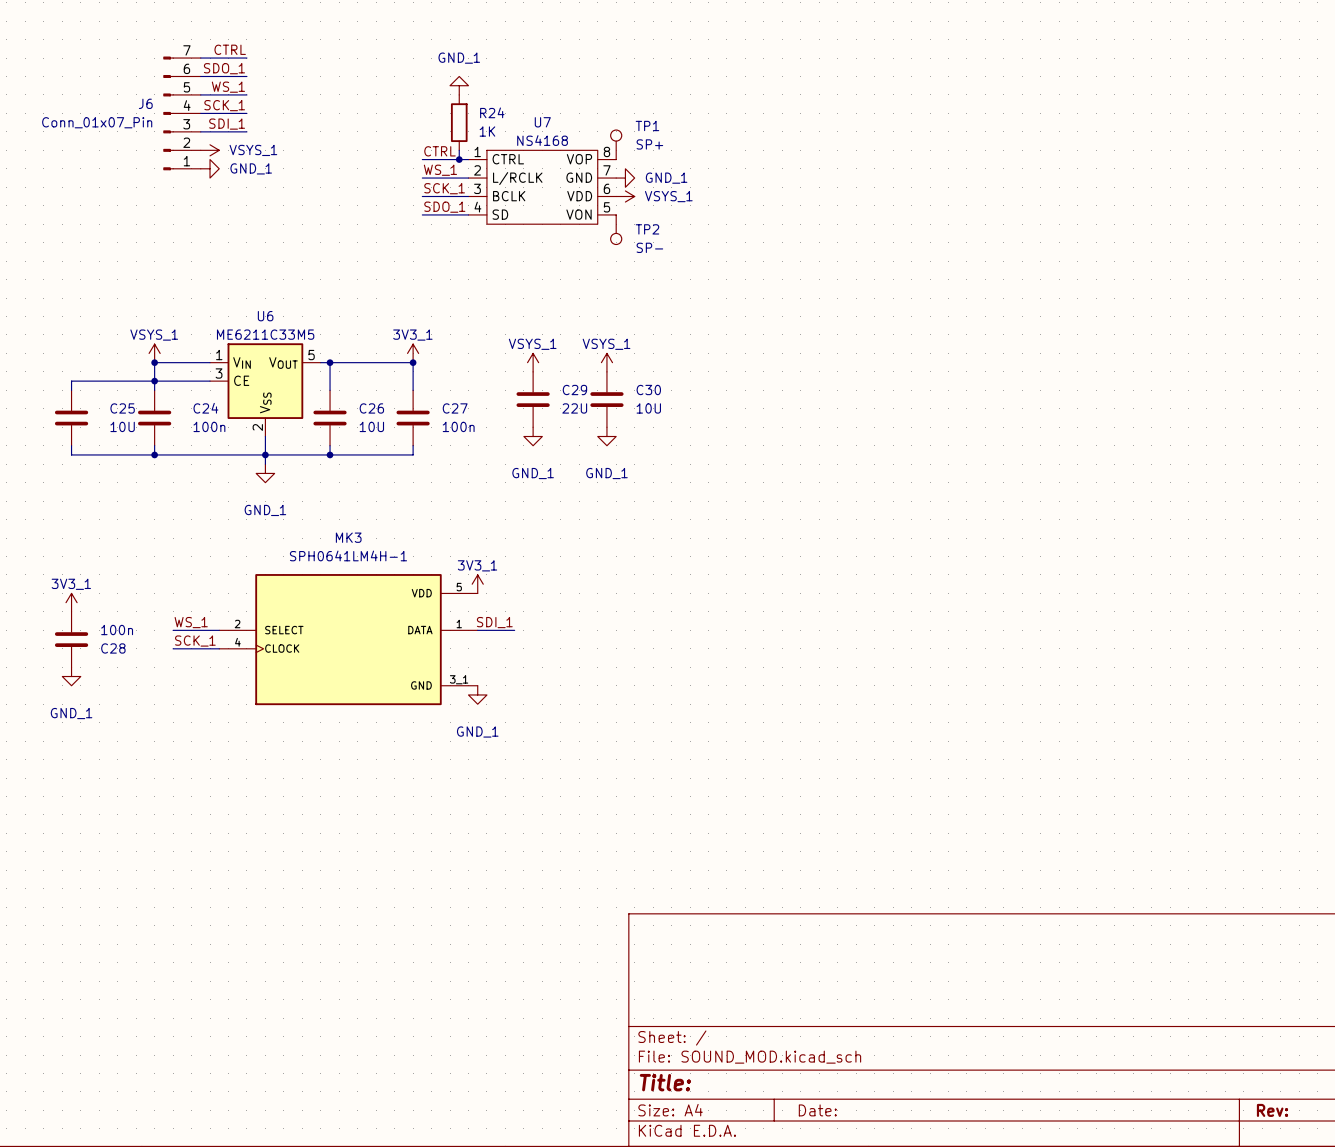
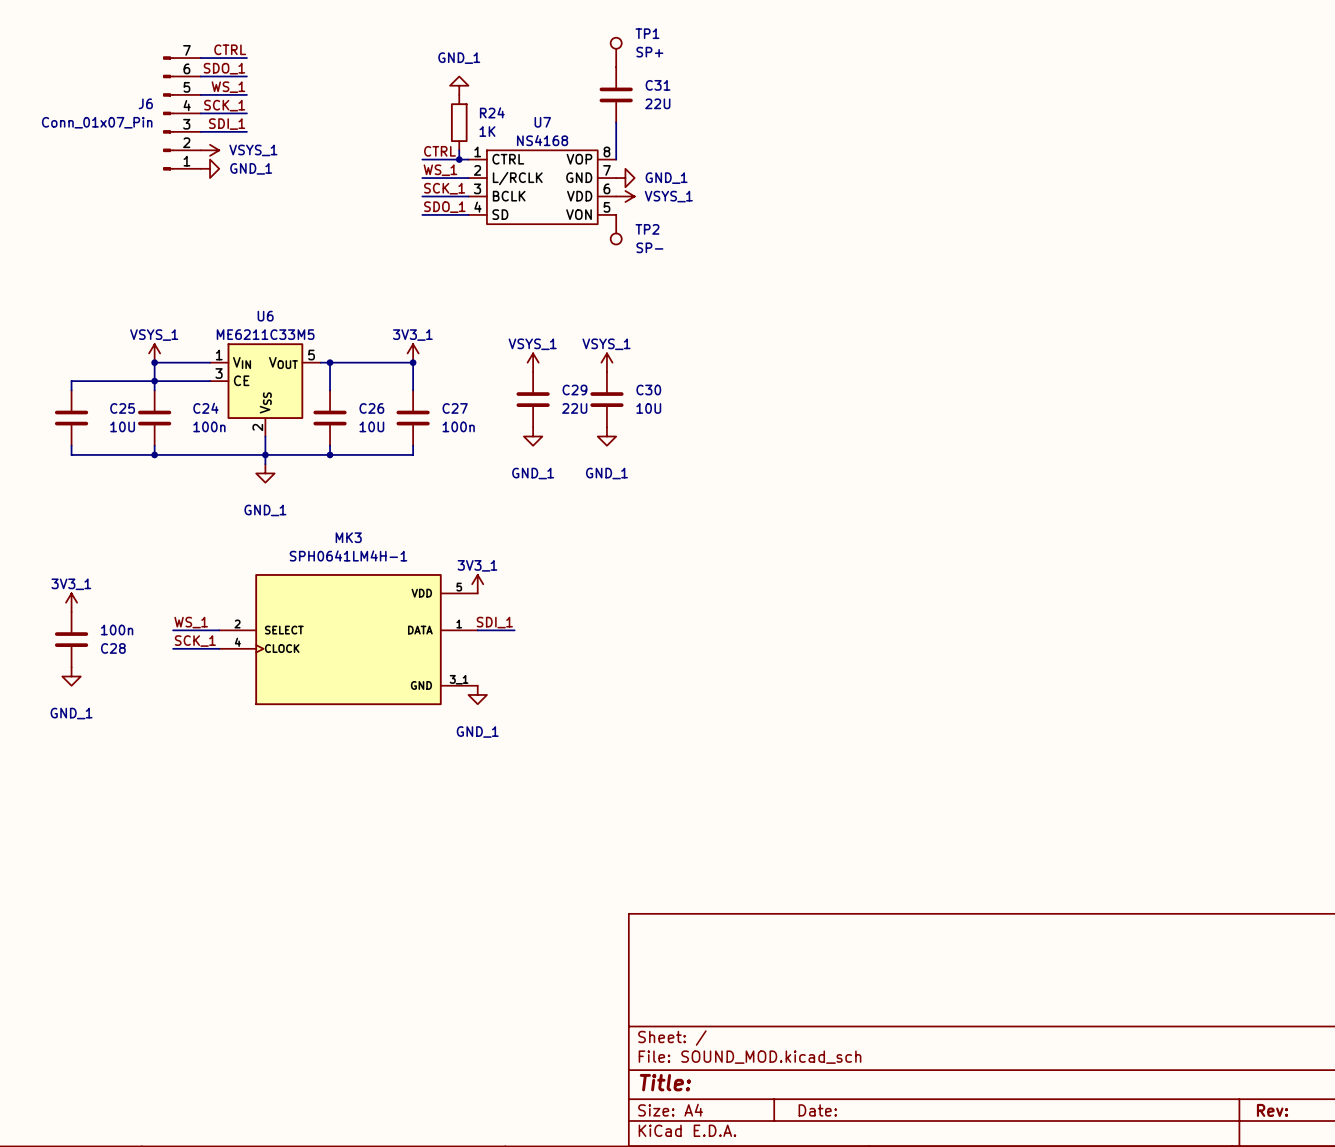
C31: none -> 22U (616, 94)
TP1 position: (616, 144) -> (616, 52)

